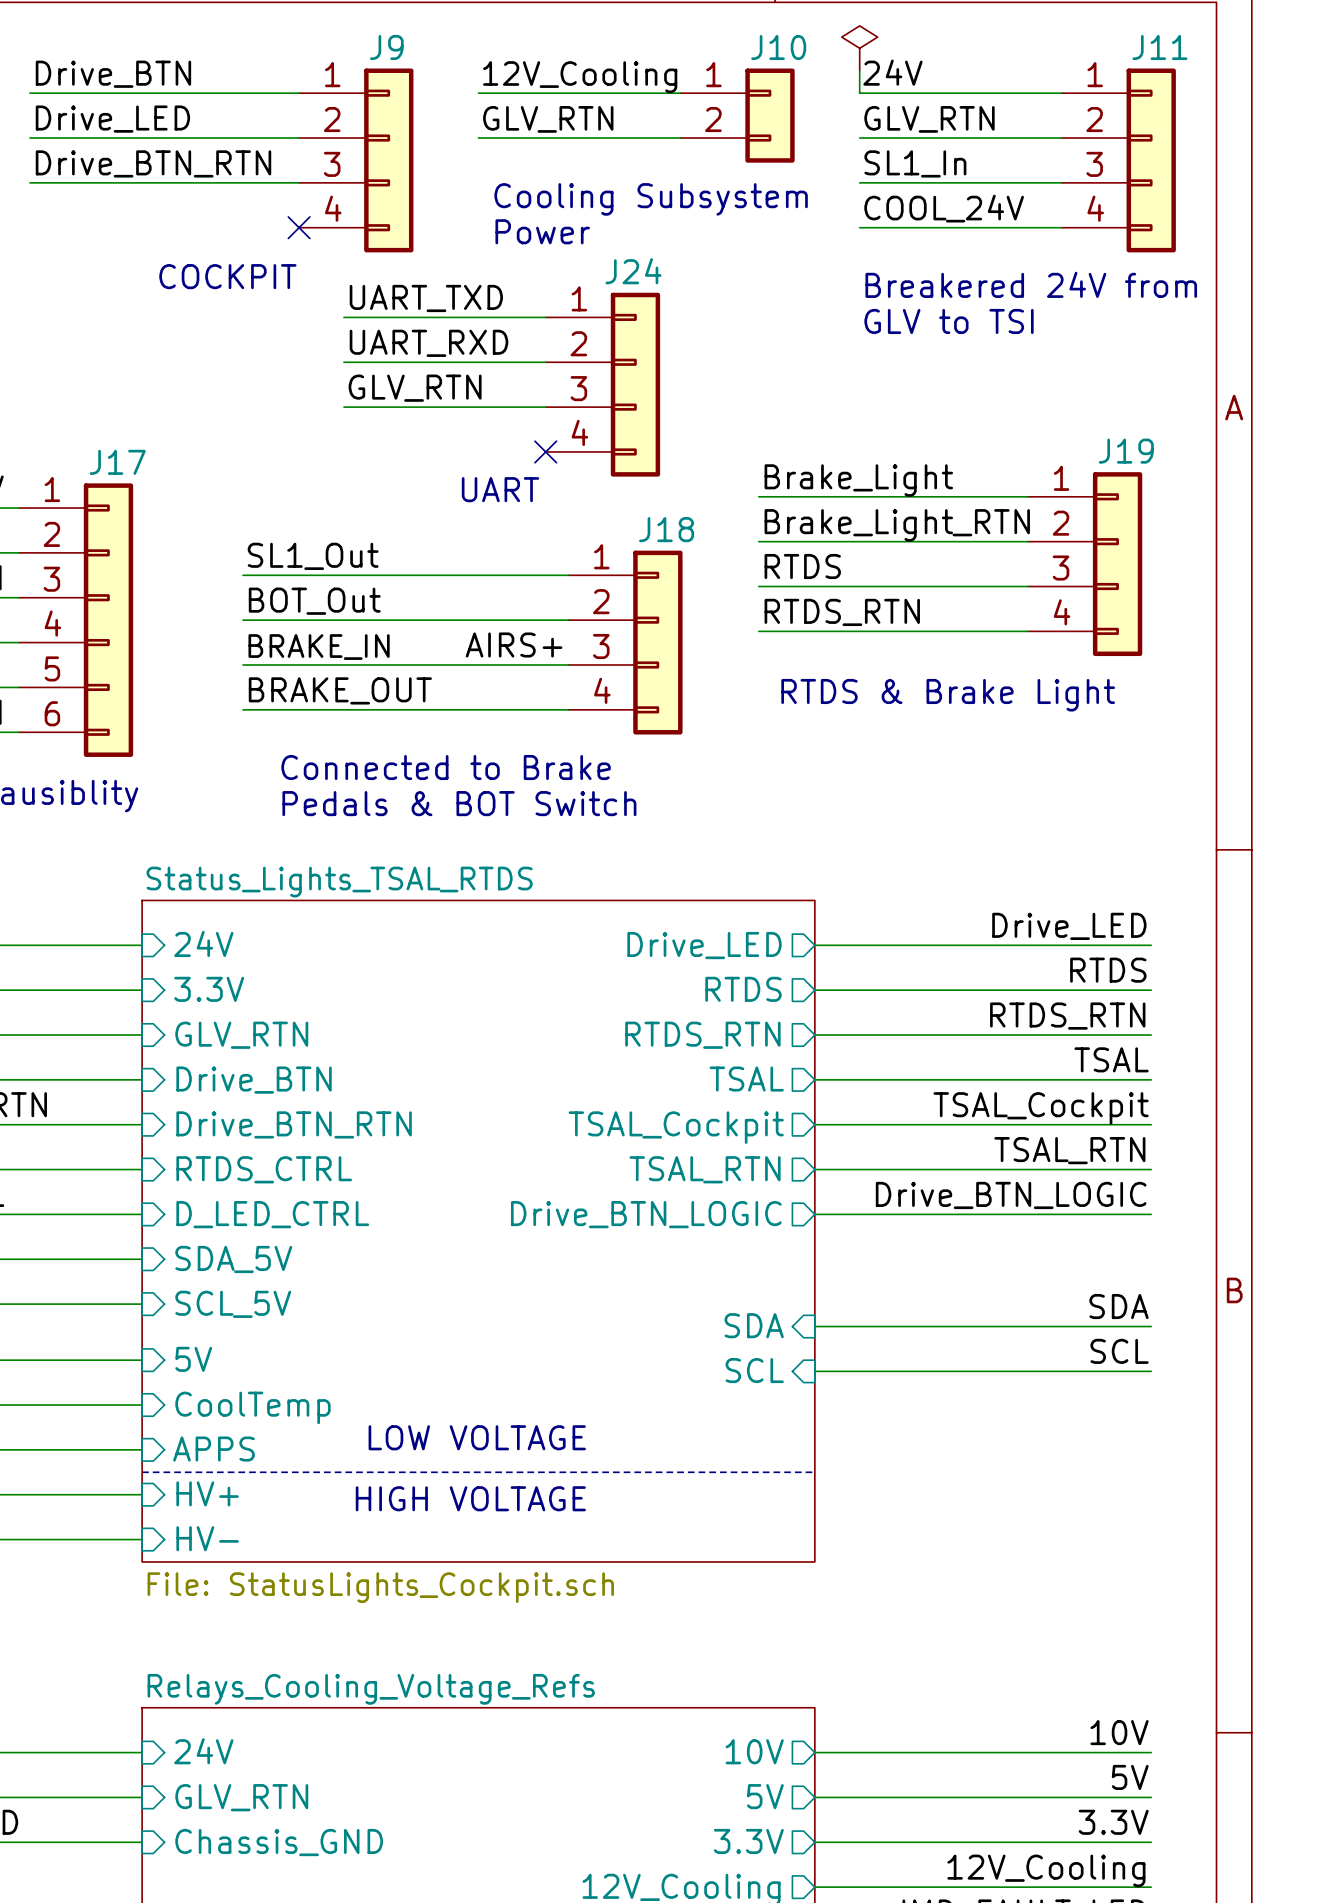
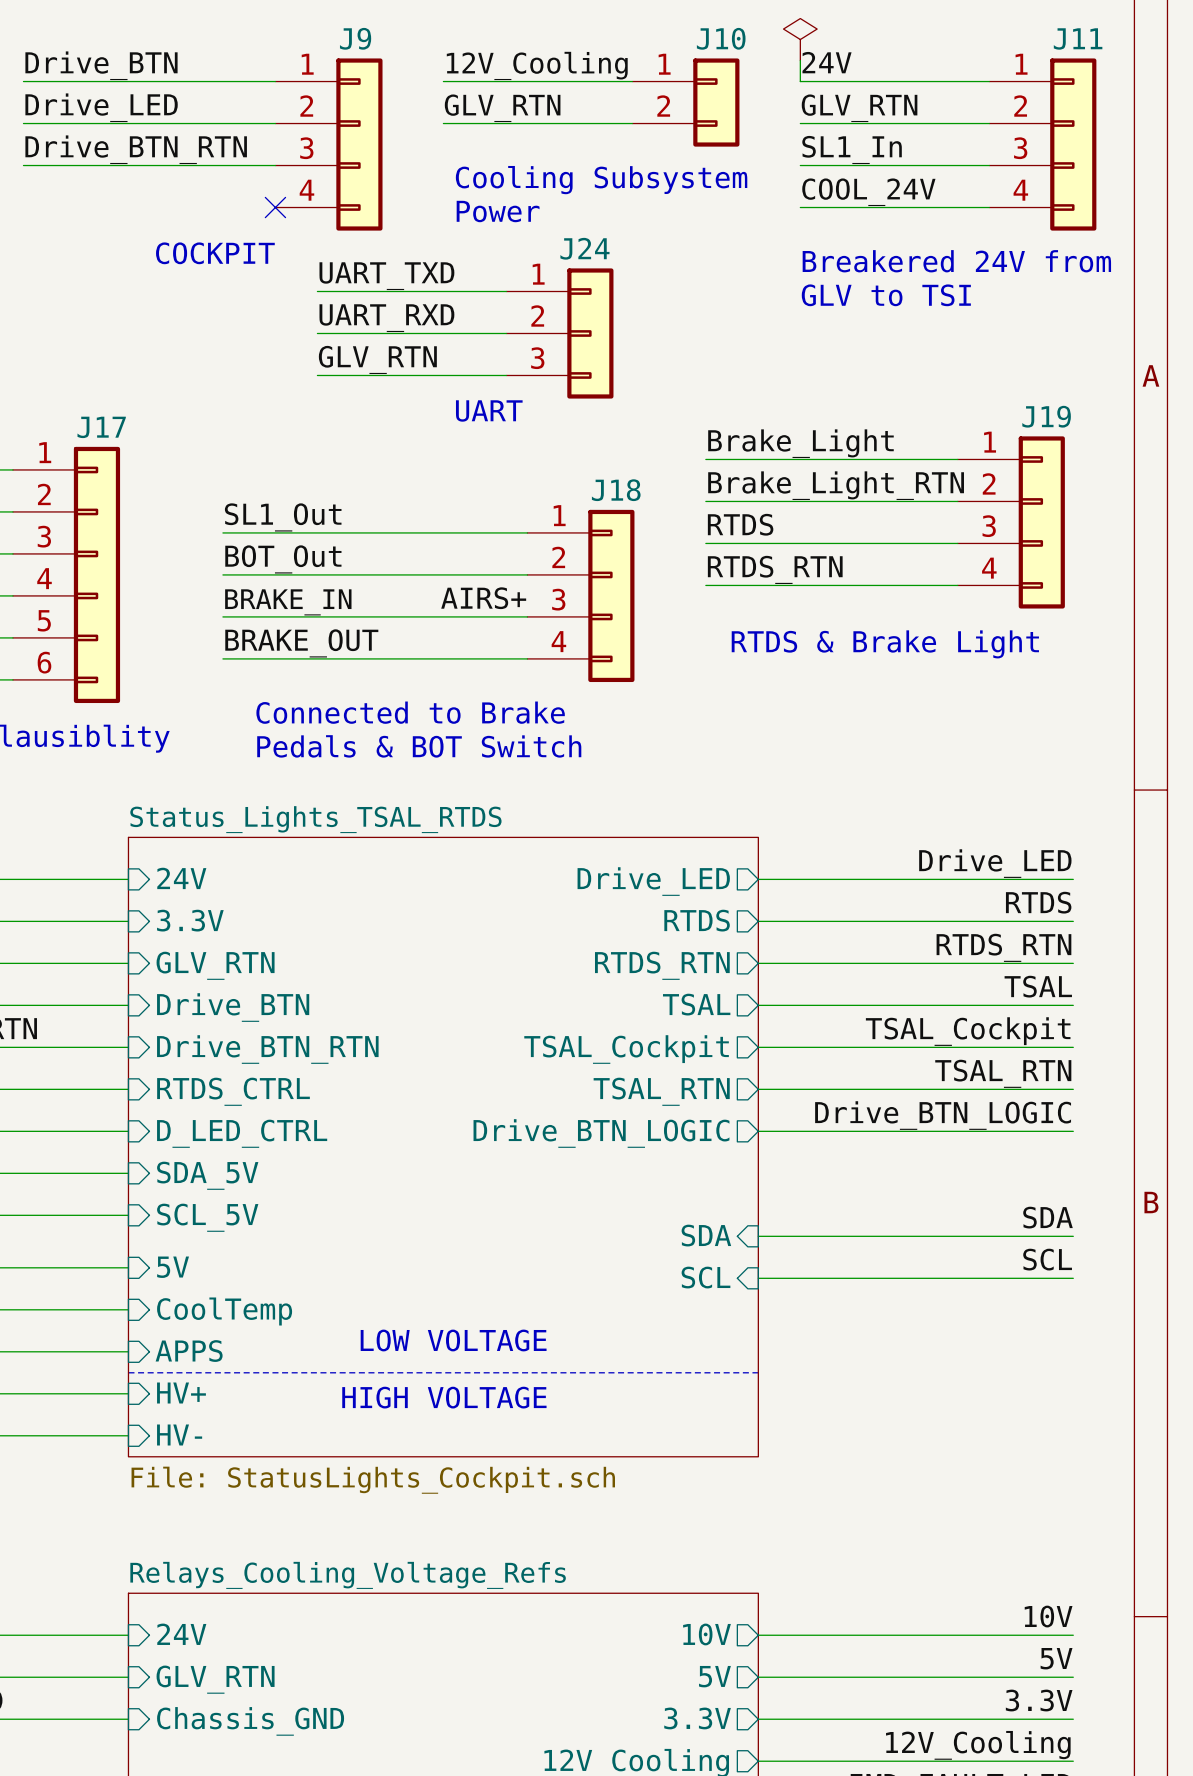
J24 symbol: [545, 292, 661, 477] -> [506, 268, 614, 399]
no-connect mark: (545, 451) -> none
text position: UART (500, 489) -> UART (489, 410)

